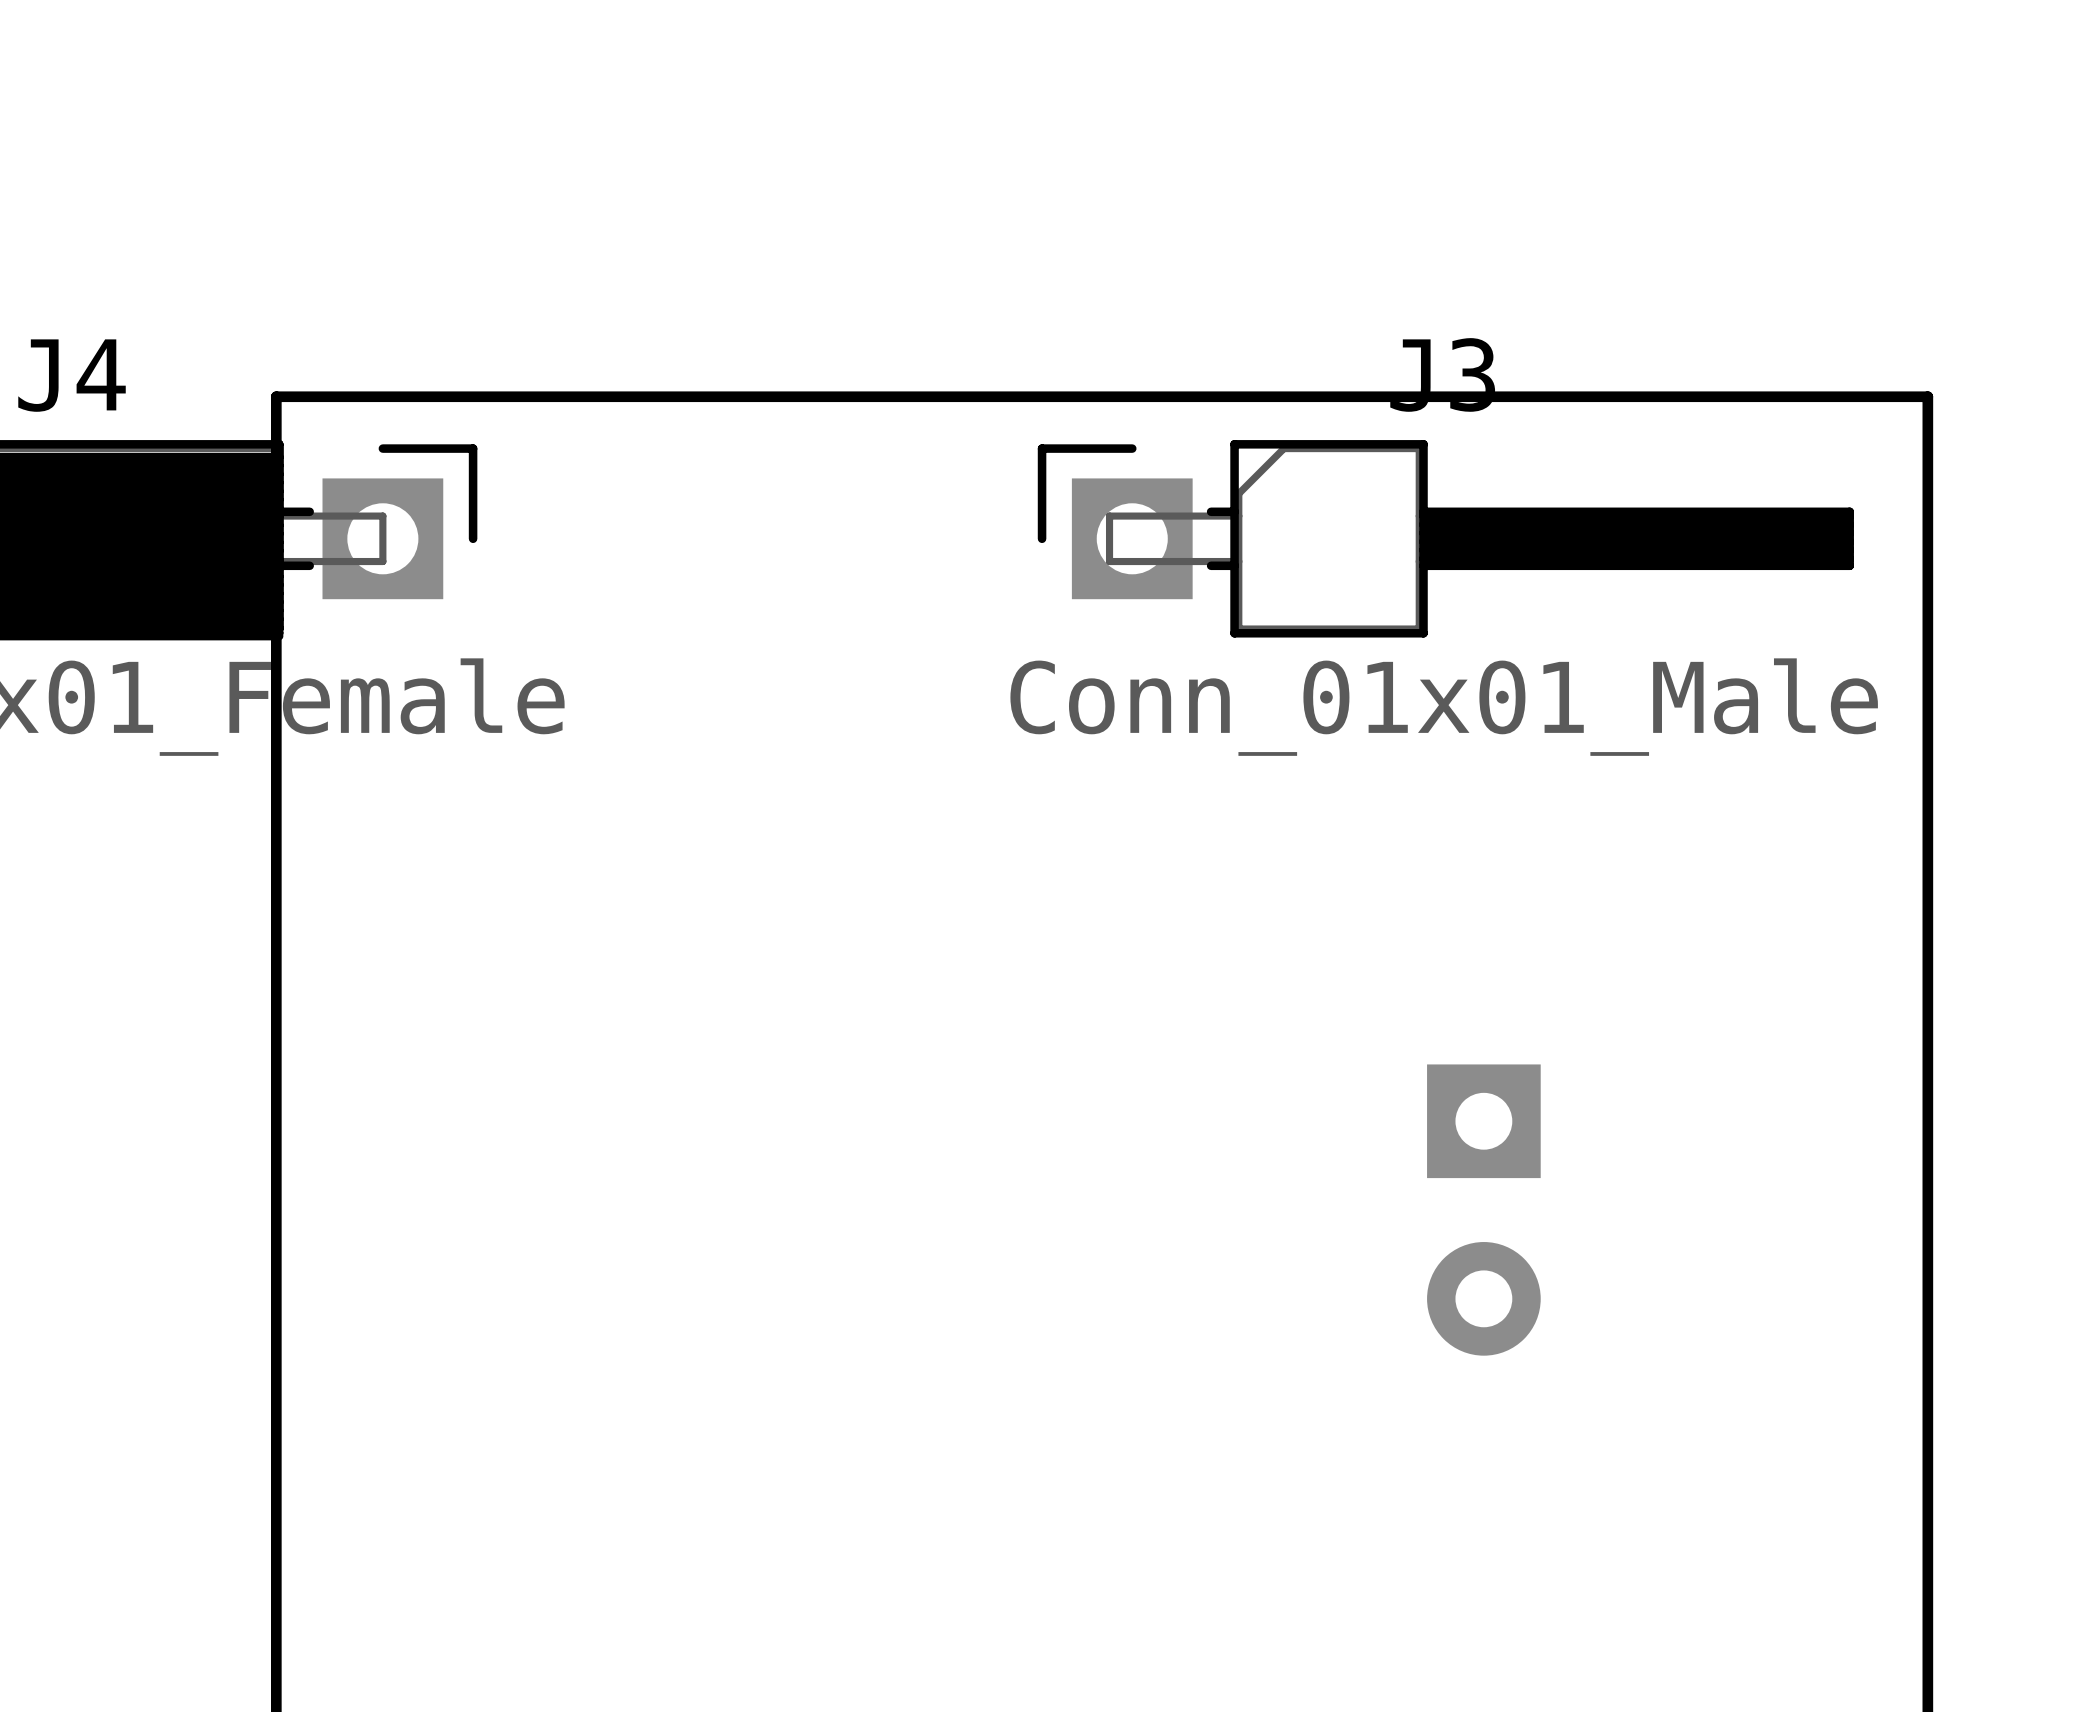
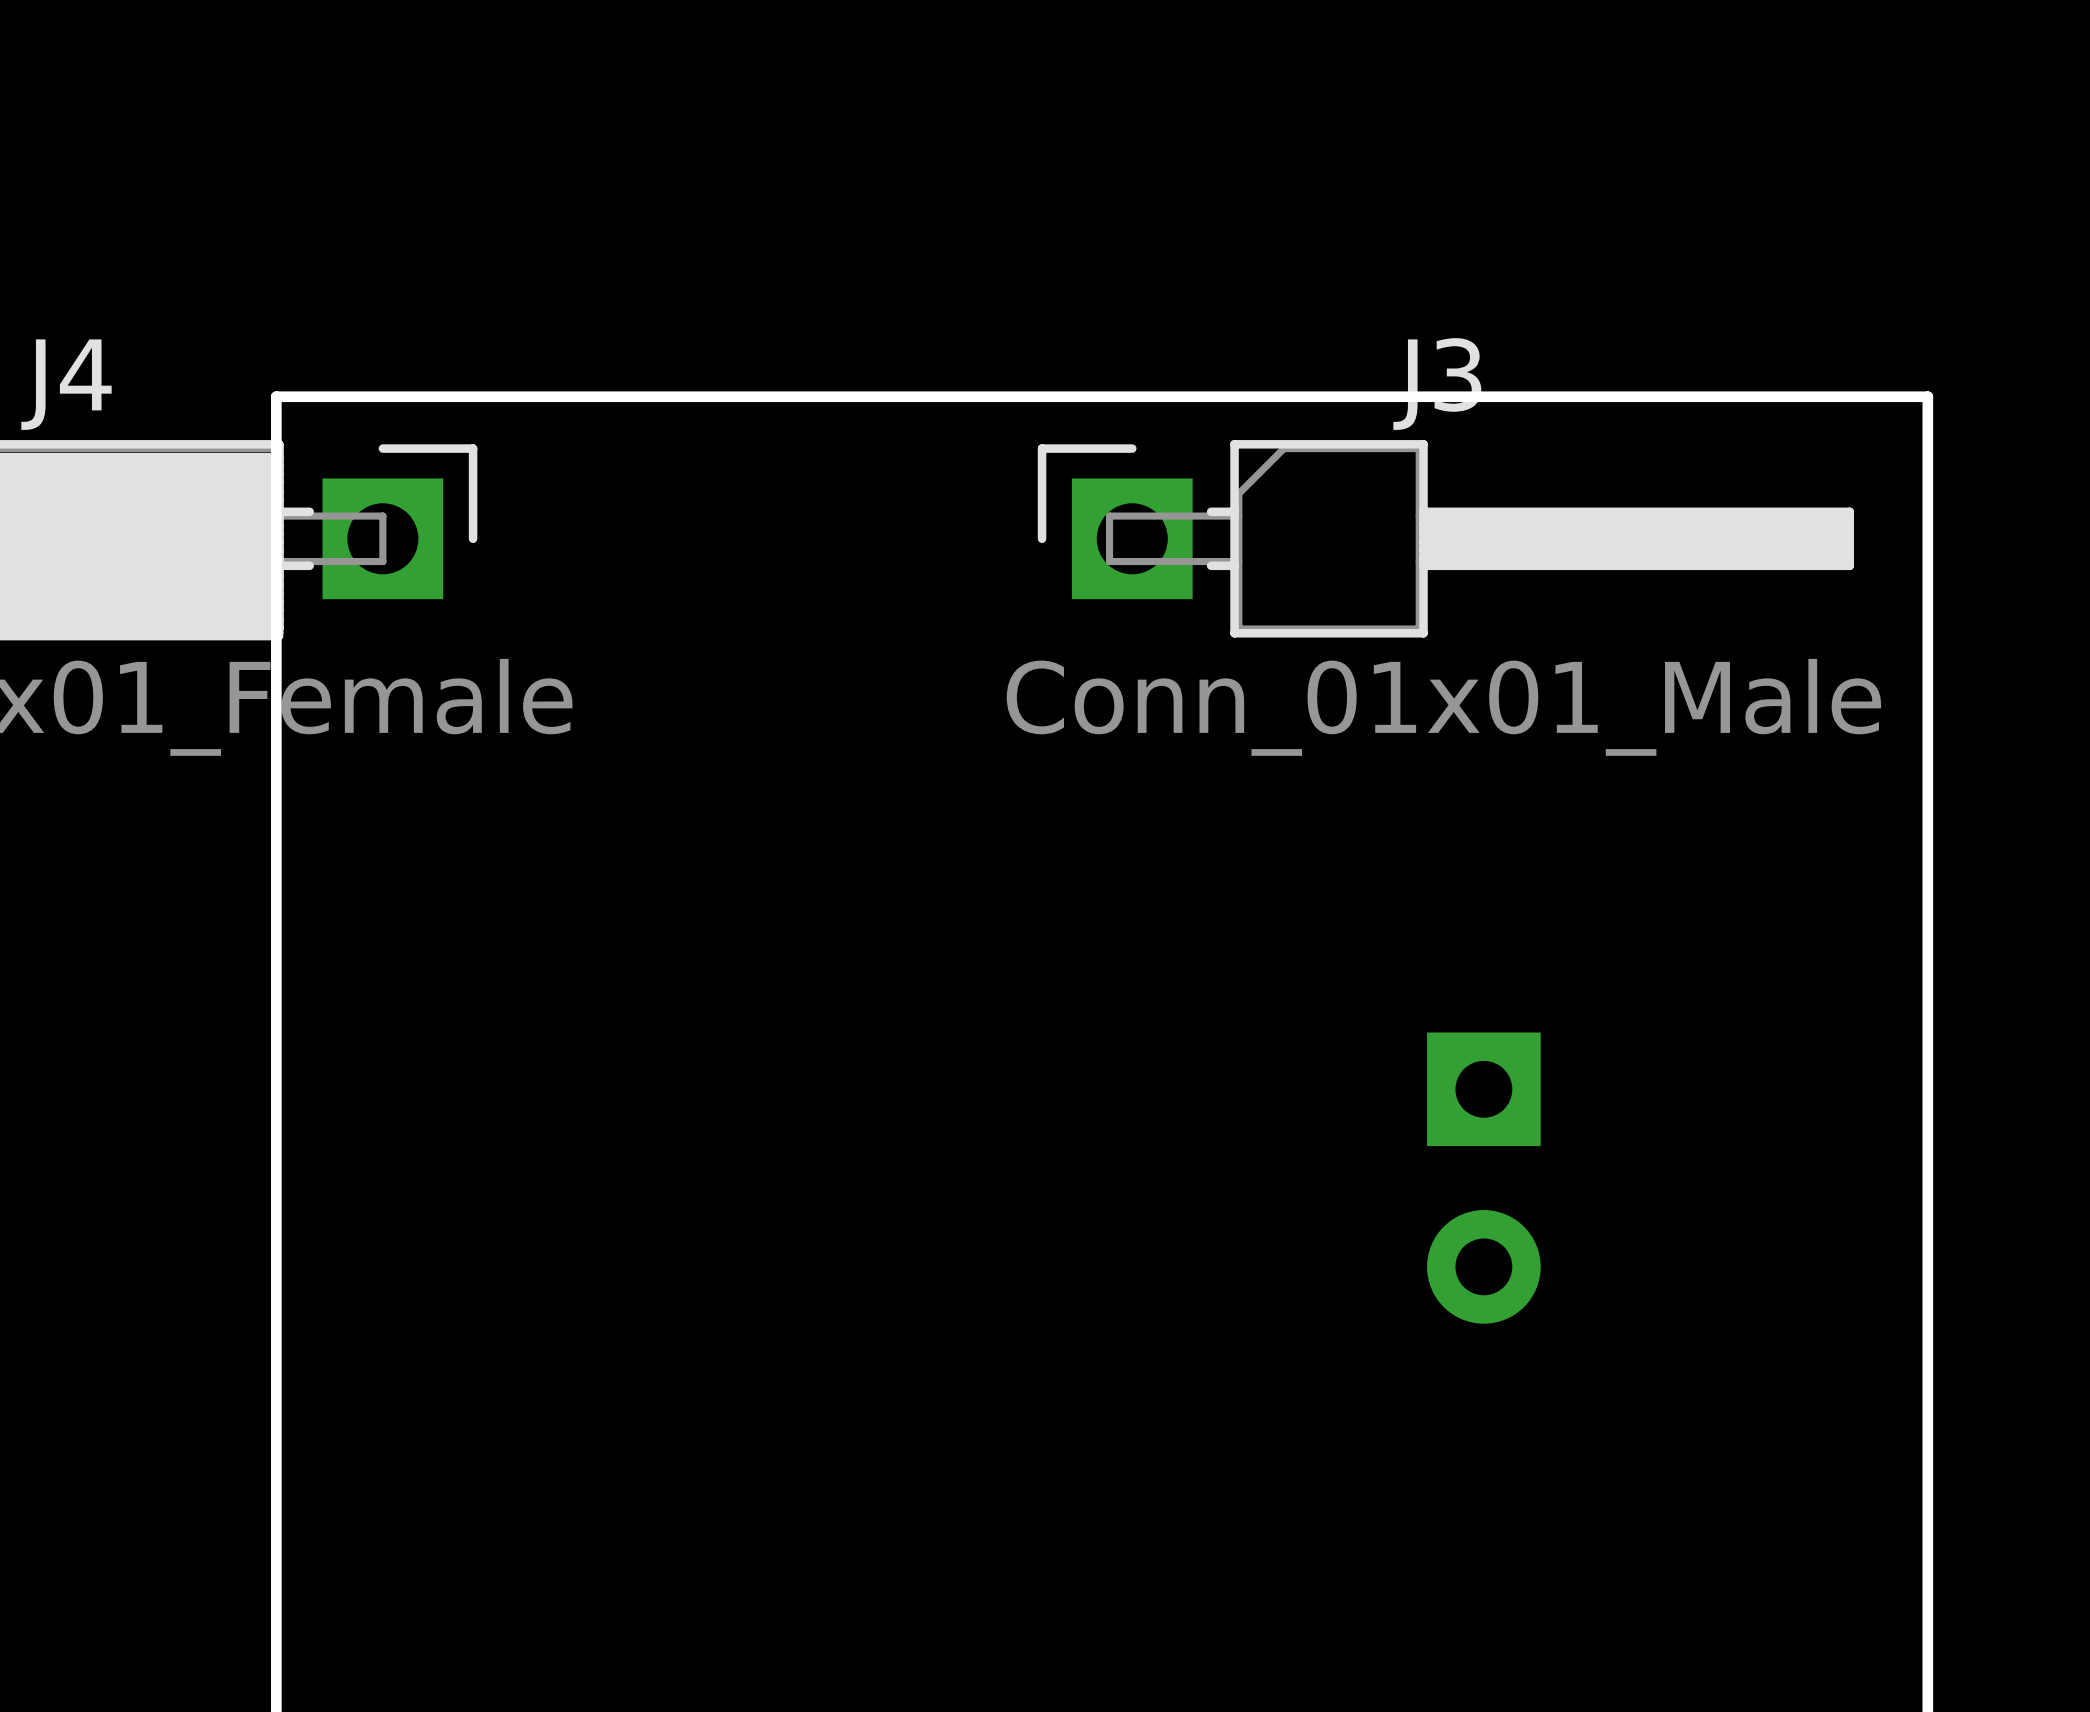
part position: (1483, 1210) -> (1483, 1178)

